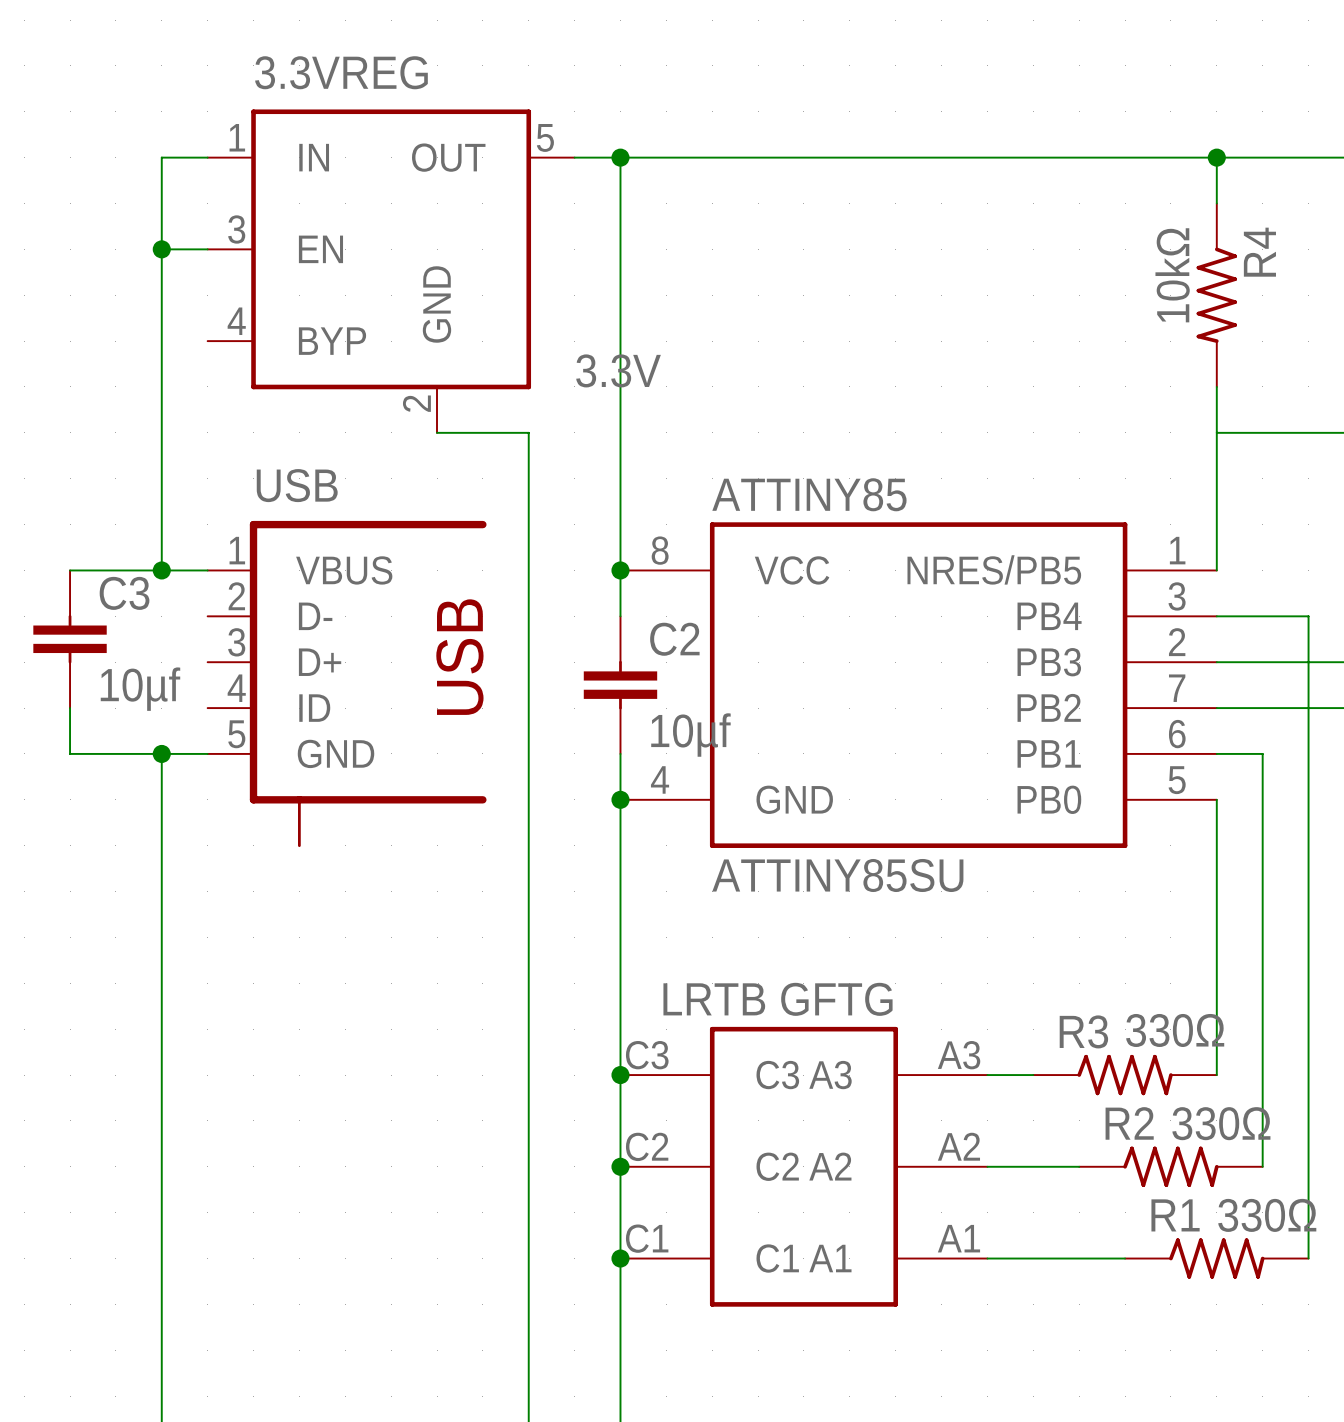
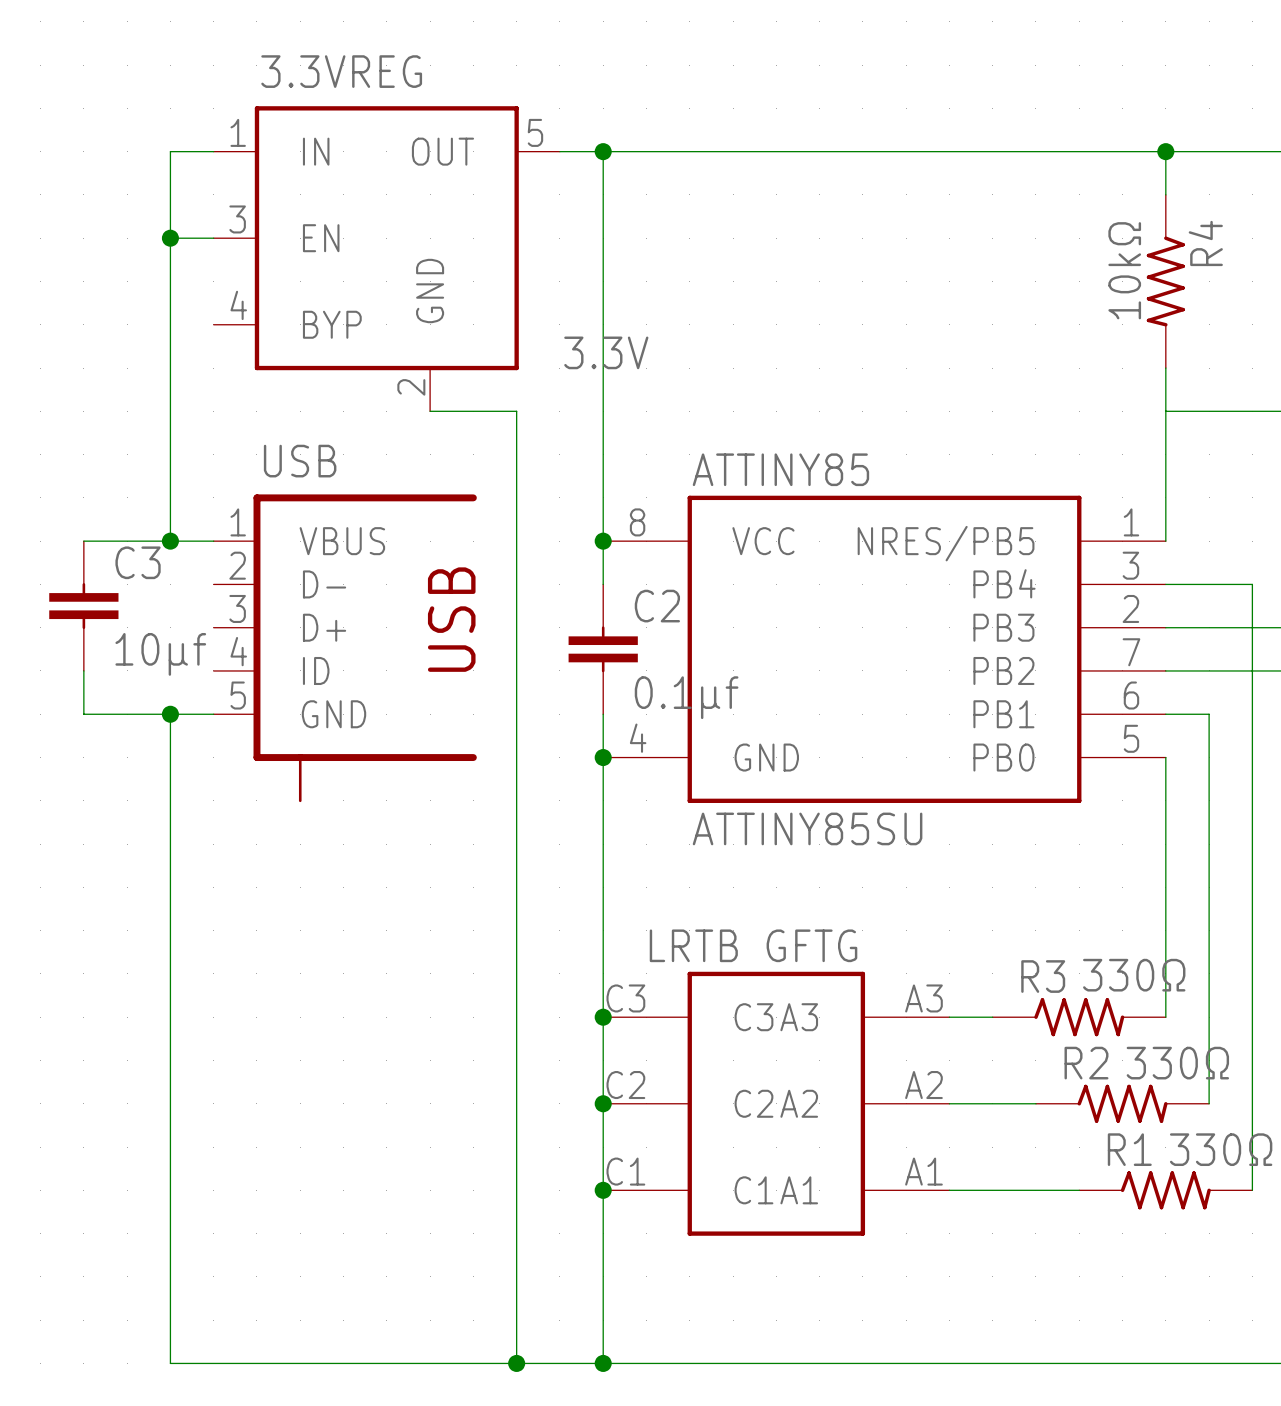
C2 value: 10µf (690, 735) -> 0.1µf (686, 697)

